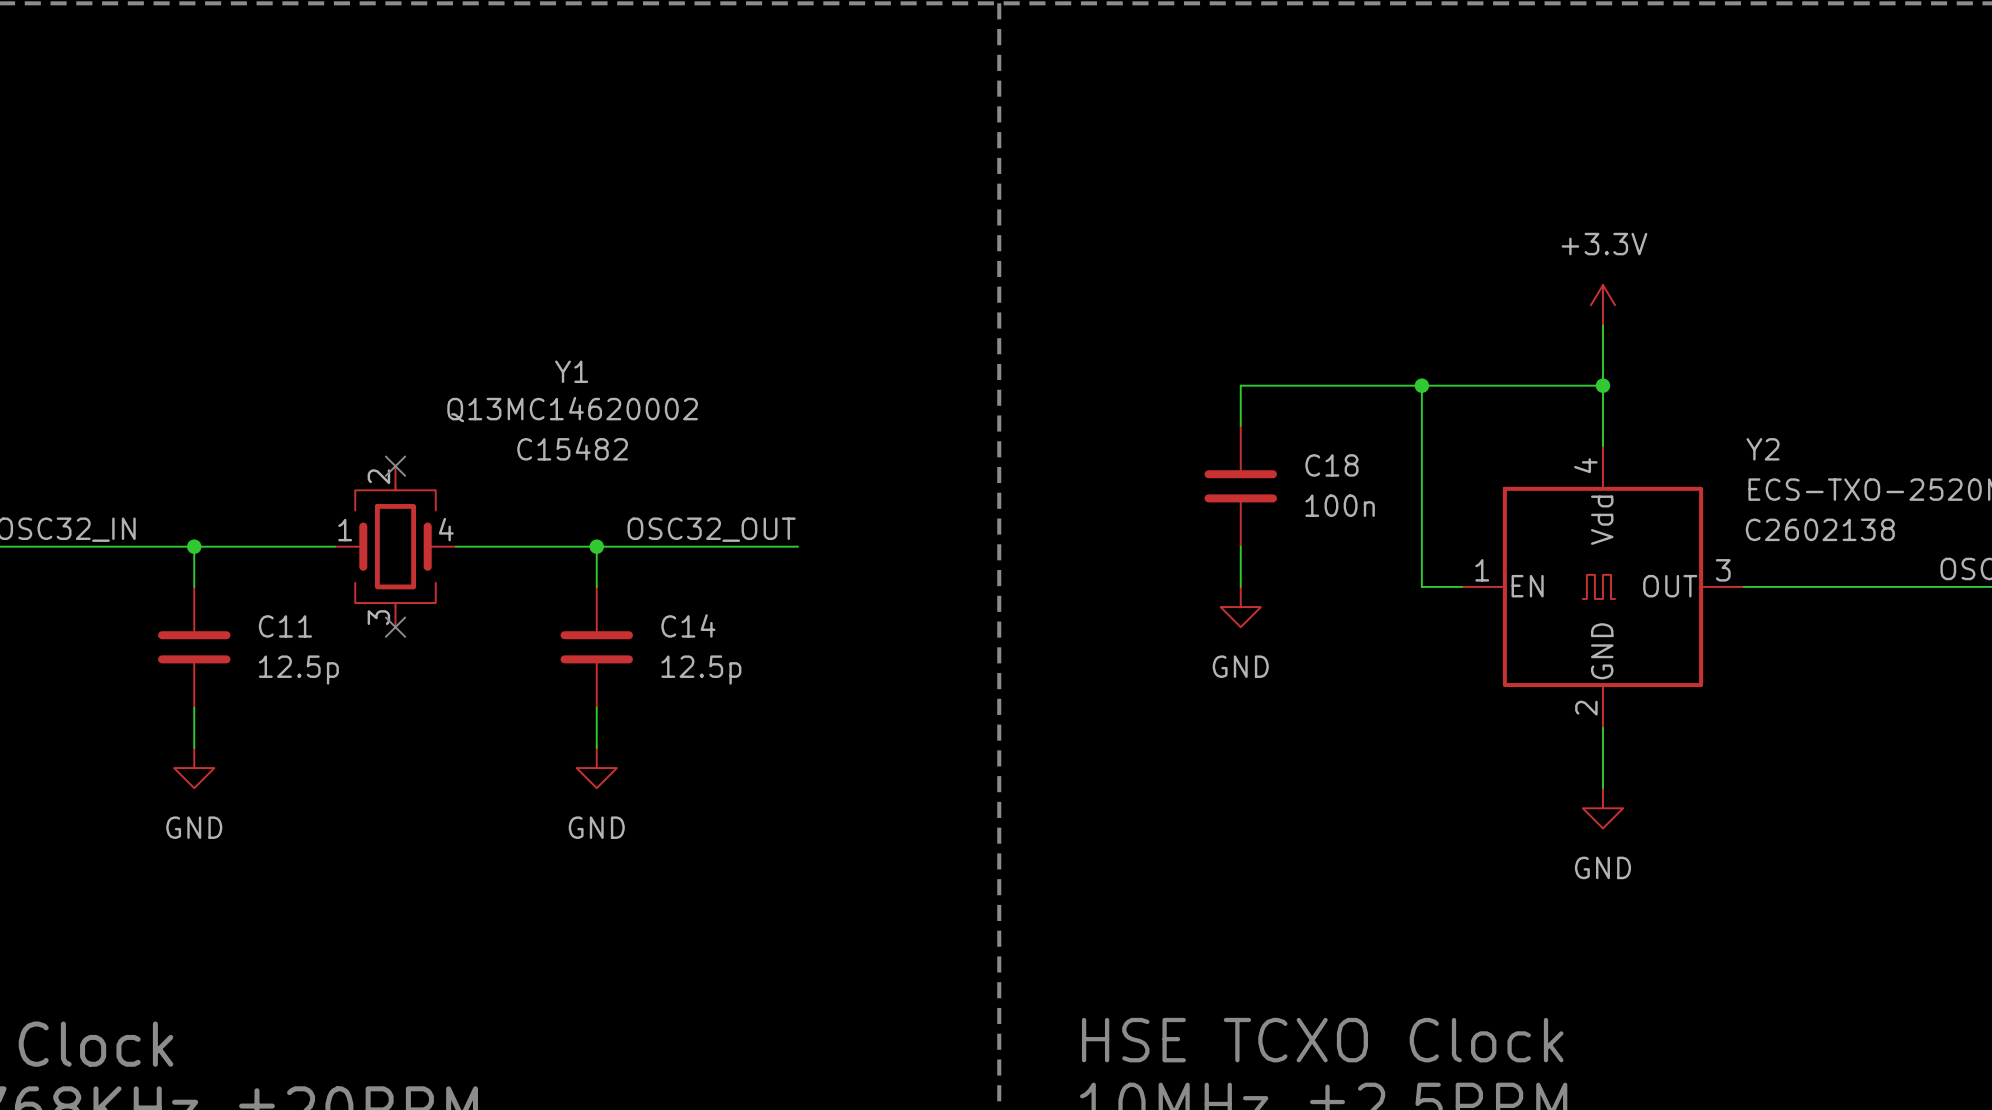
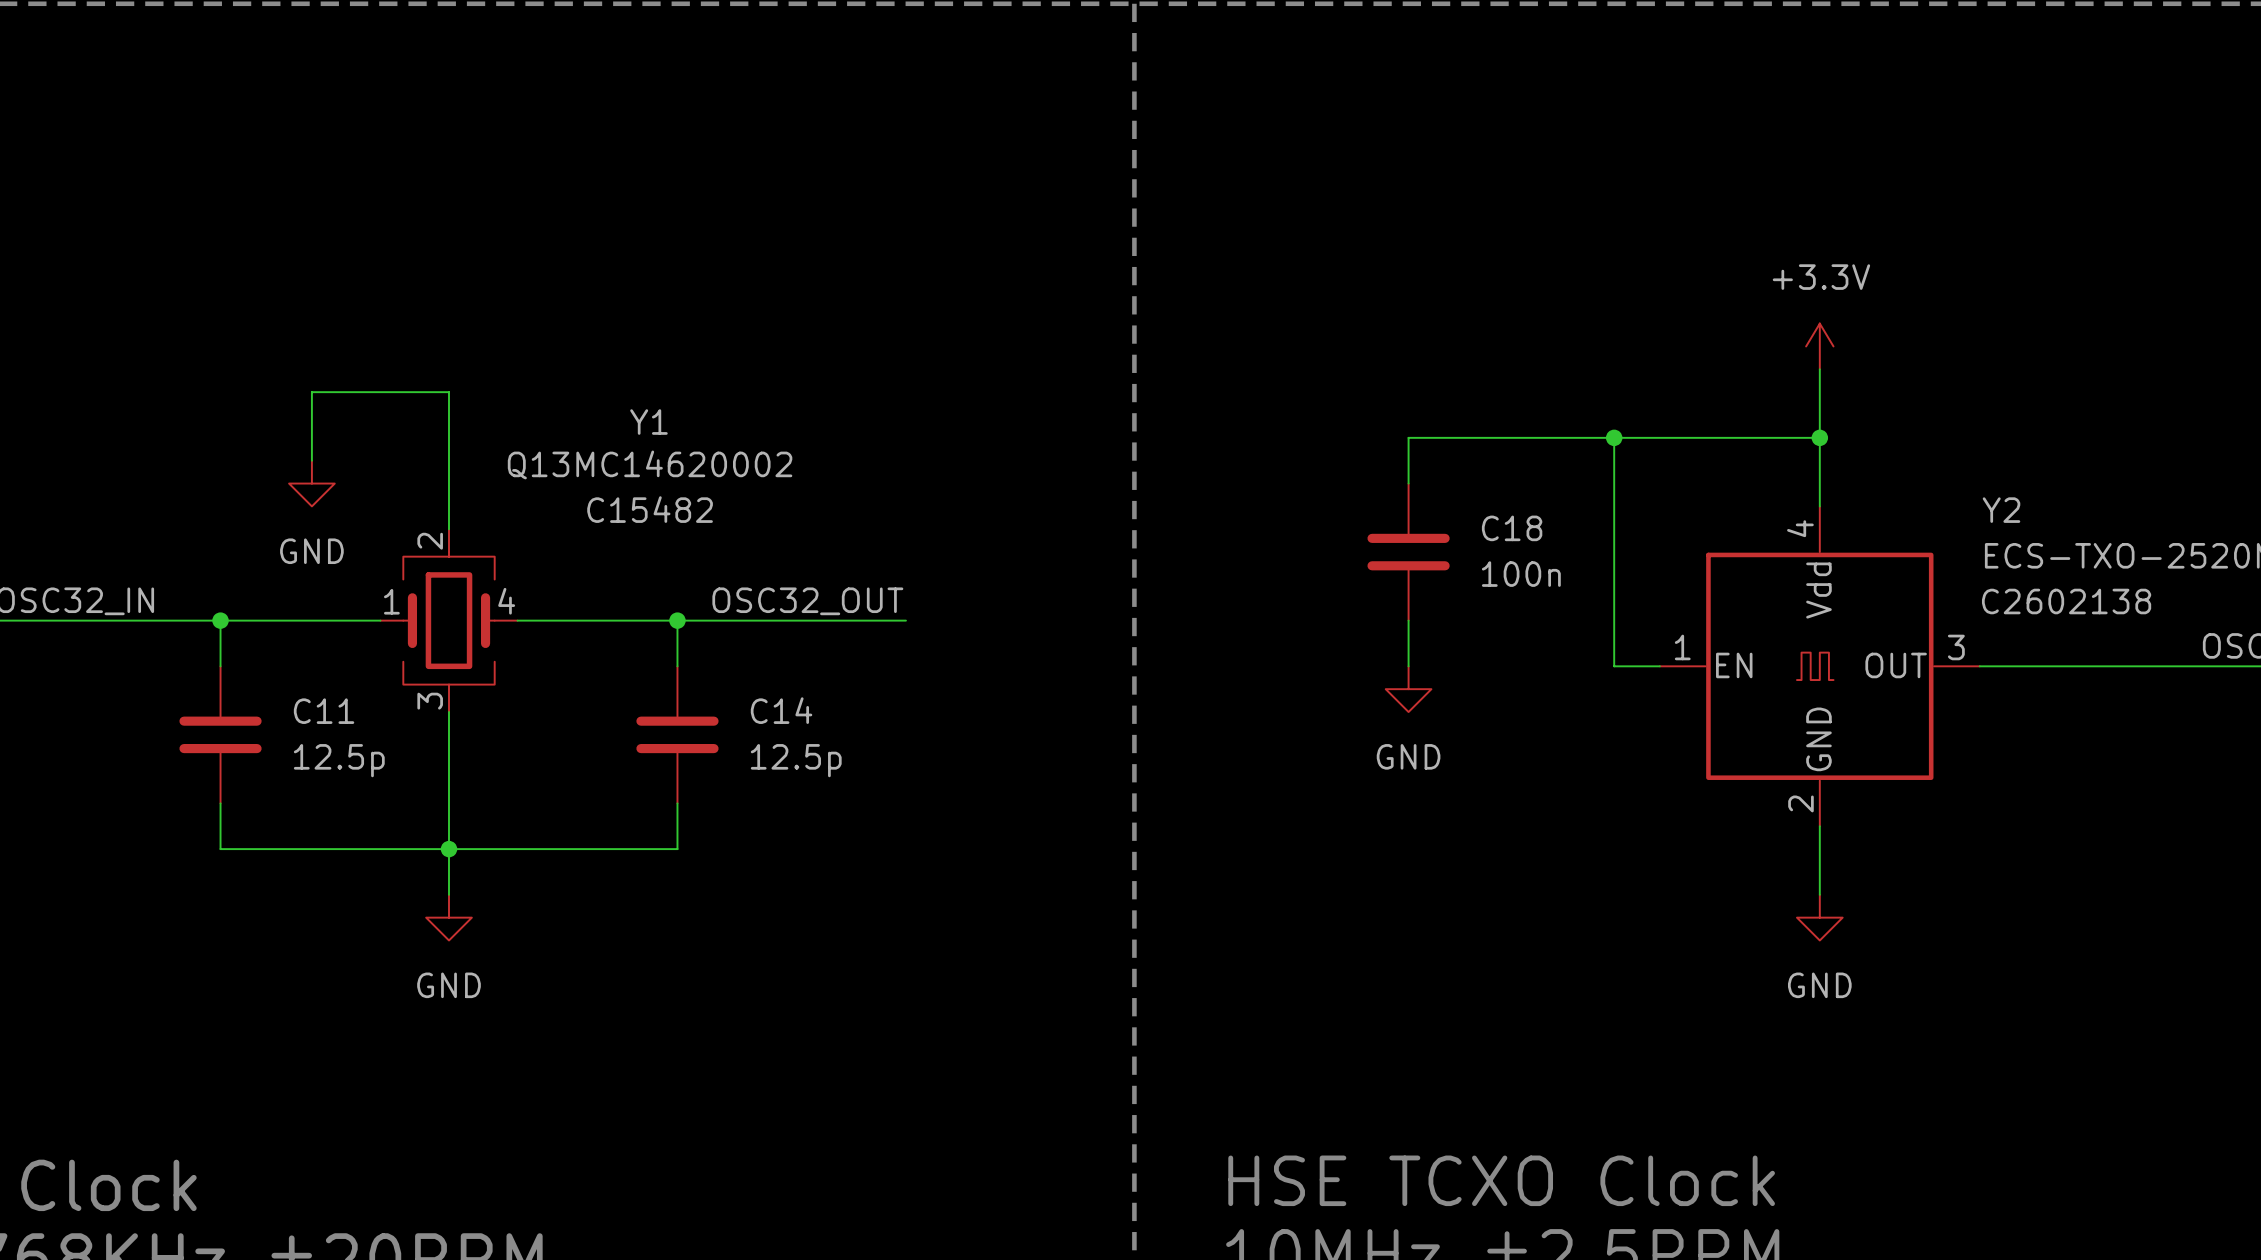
wire: none -> (311, 460) (311, 392) (449, 392) (449, 529)
power symbol: none -> GND (311, 483)
no-connect mark: (395, 466) -> none
wire: none -> (449, 712) (449, 894)
no-connect mark: (395, 627) -> none
wire: none -> (220, 849) (677, 849)
junction: none -> (449, 849)
power symbol: GND (194, 768) -> none
power symbol: GND (596, 768) -> none
power symbol: none -> GND (449, 917)

